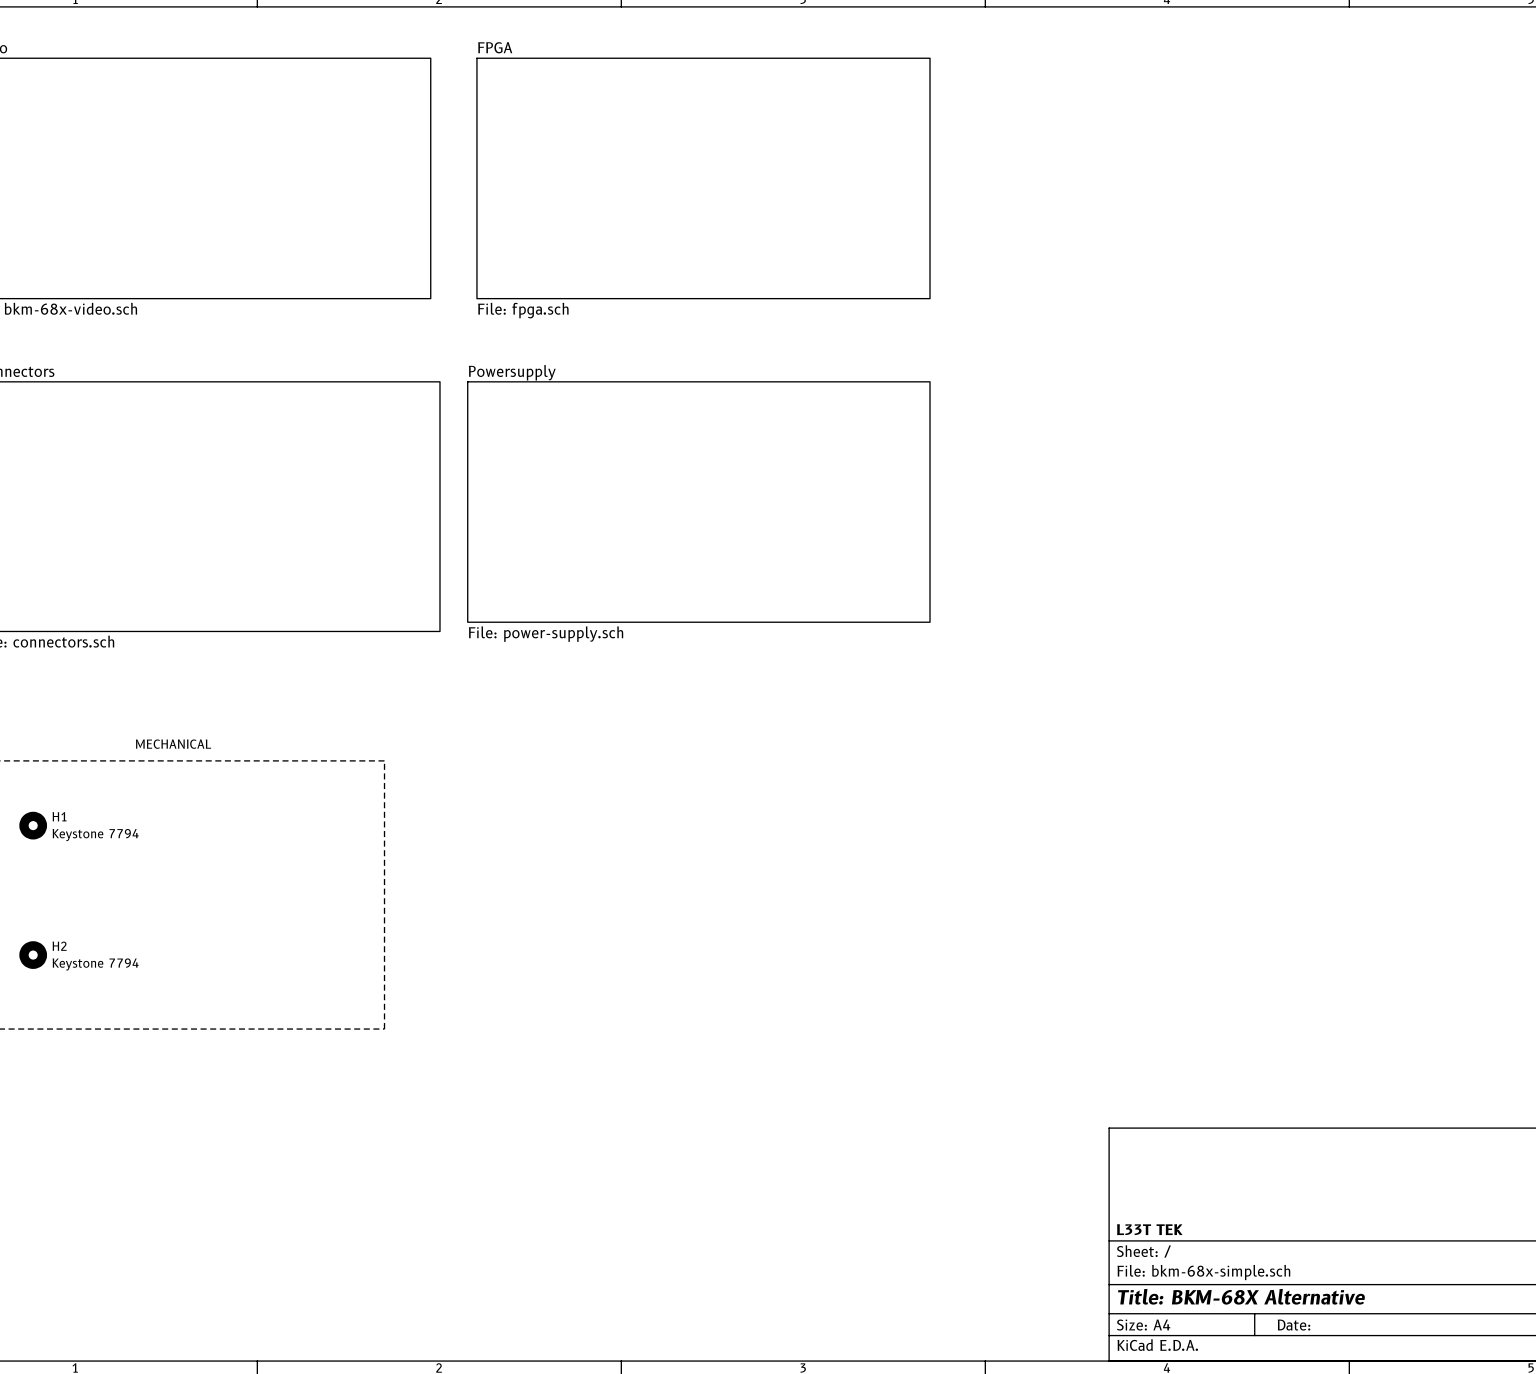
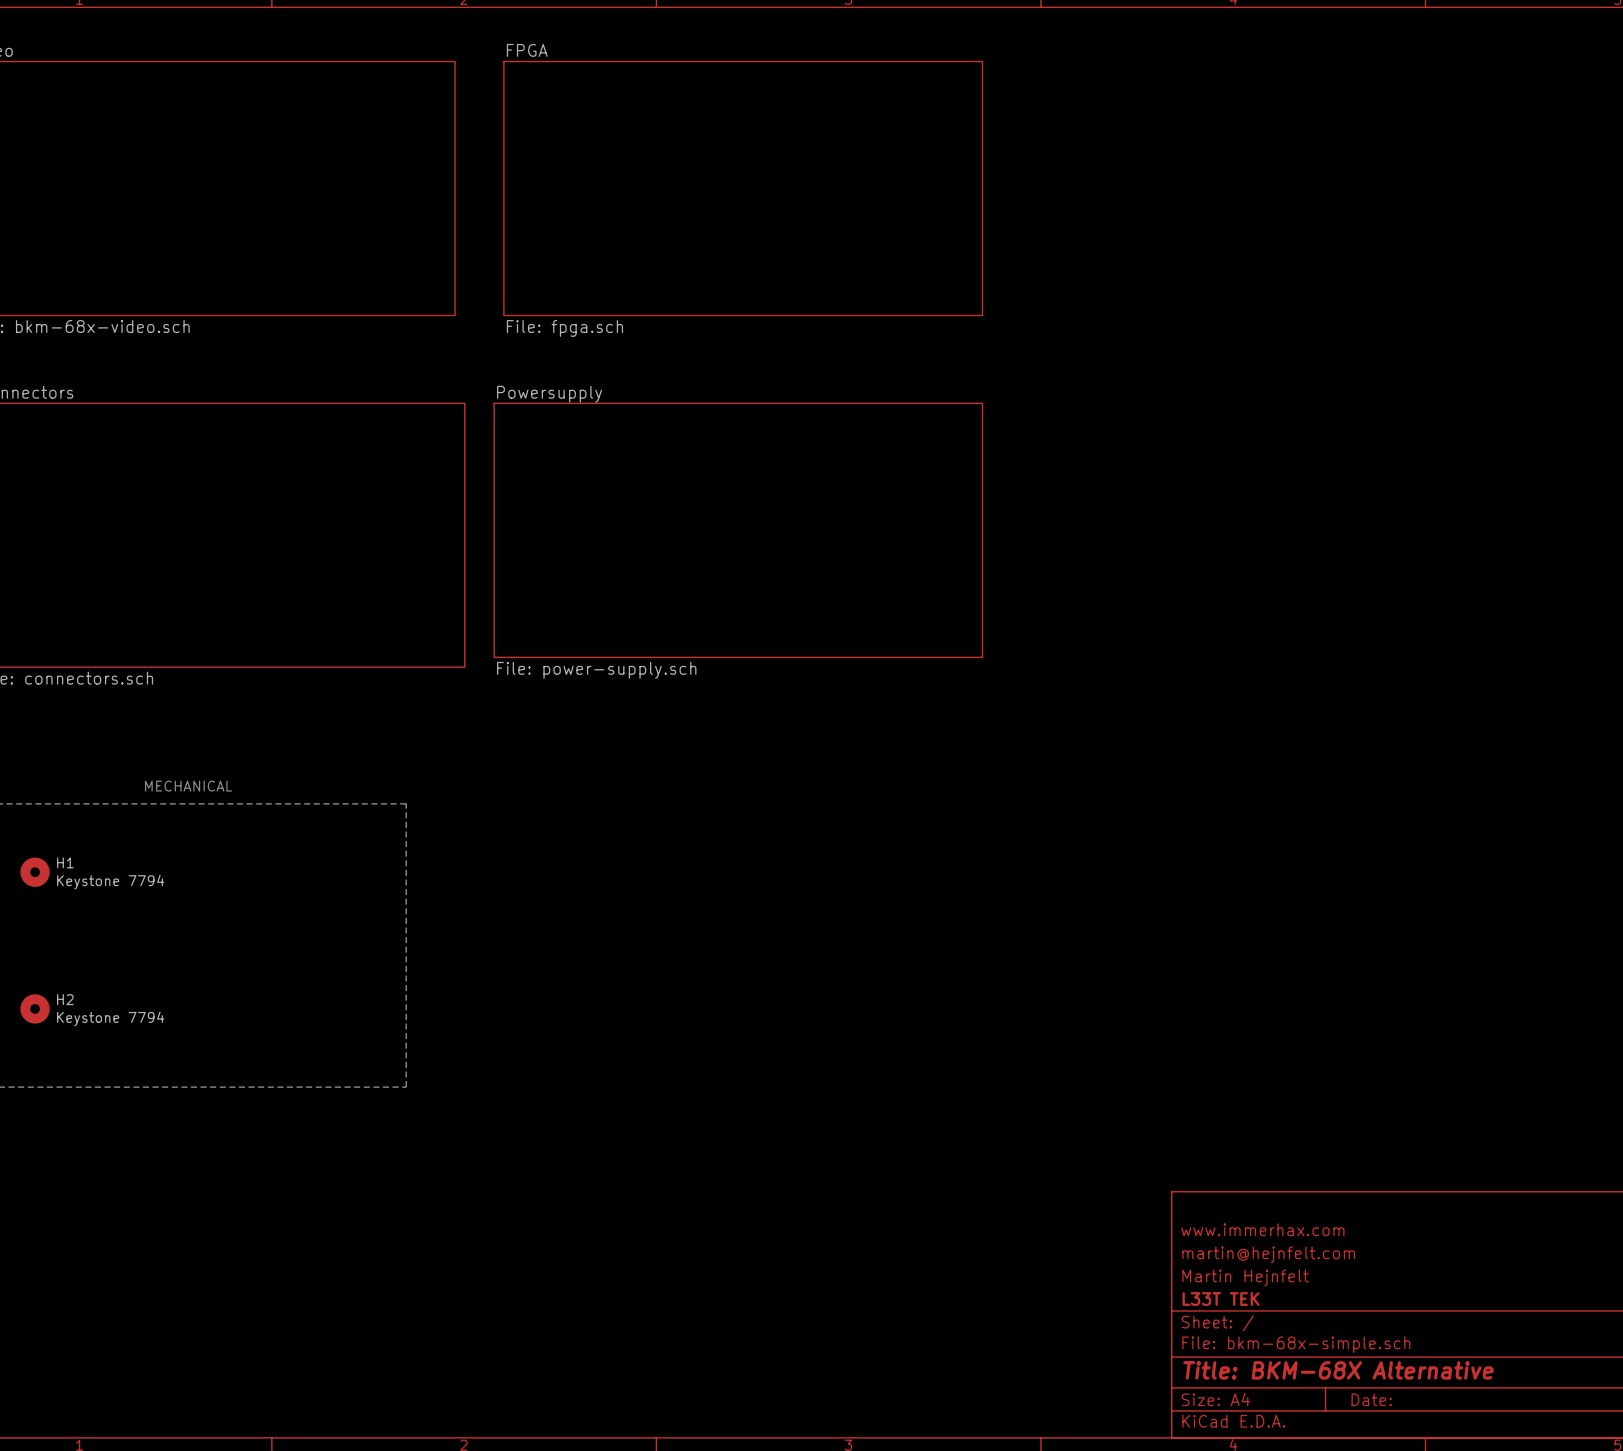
title block: none -> www.immerhax.com (1262, 1229)
title block: none -> martin@hejnfelt.com (1268, 1254)
title block: none -> Martin Hejnfelt (1245, 1277)

